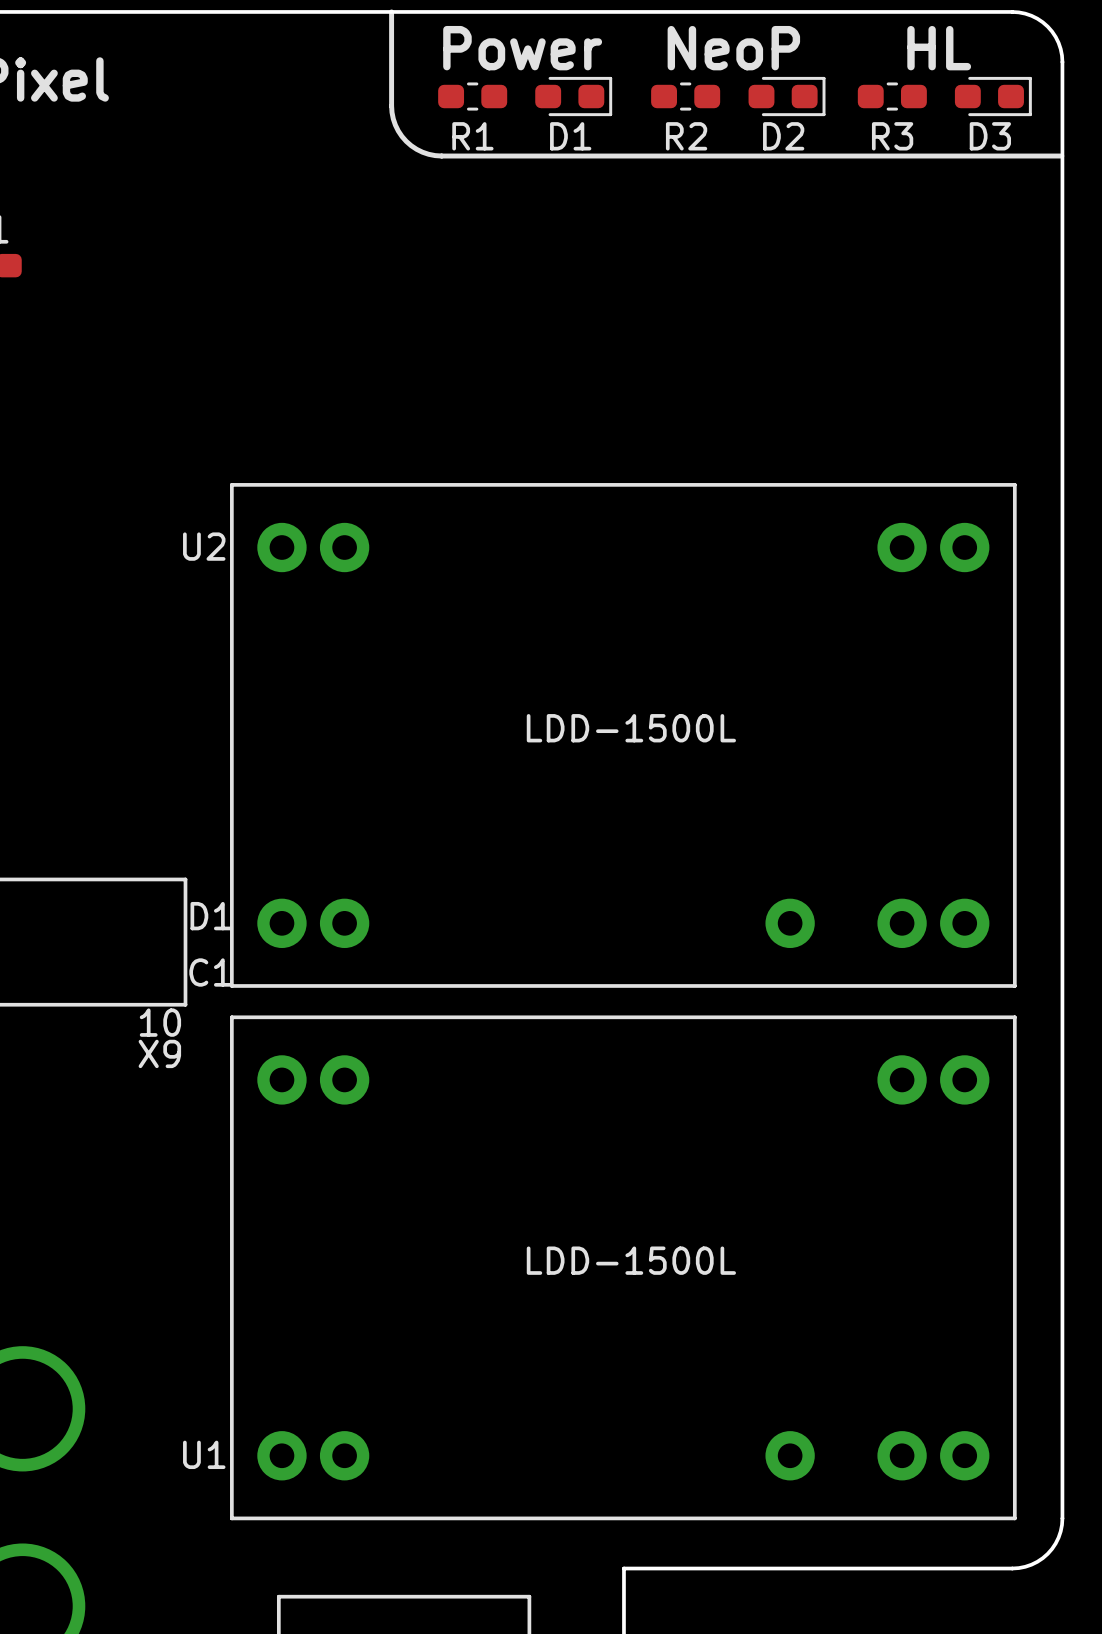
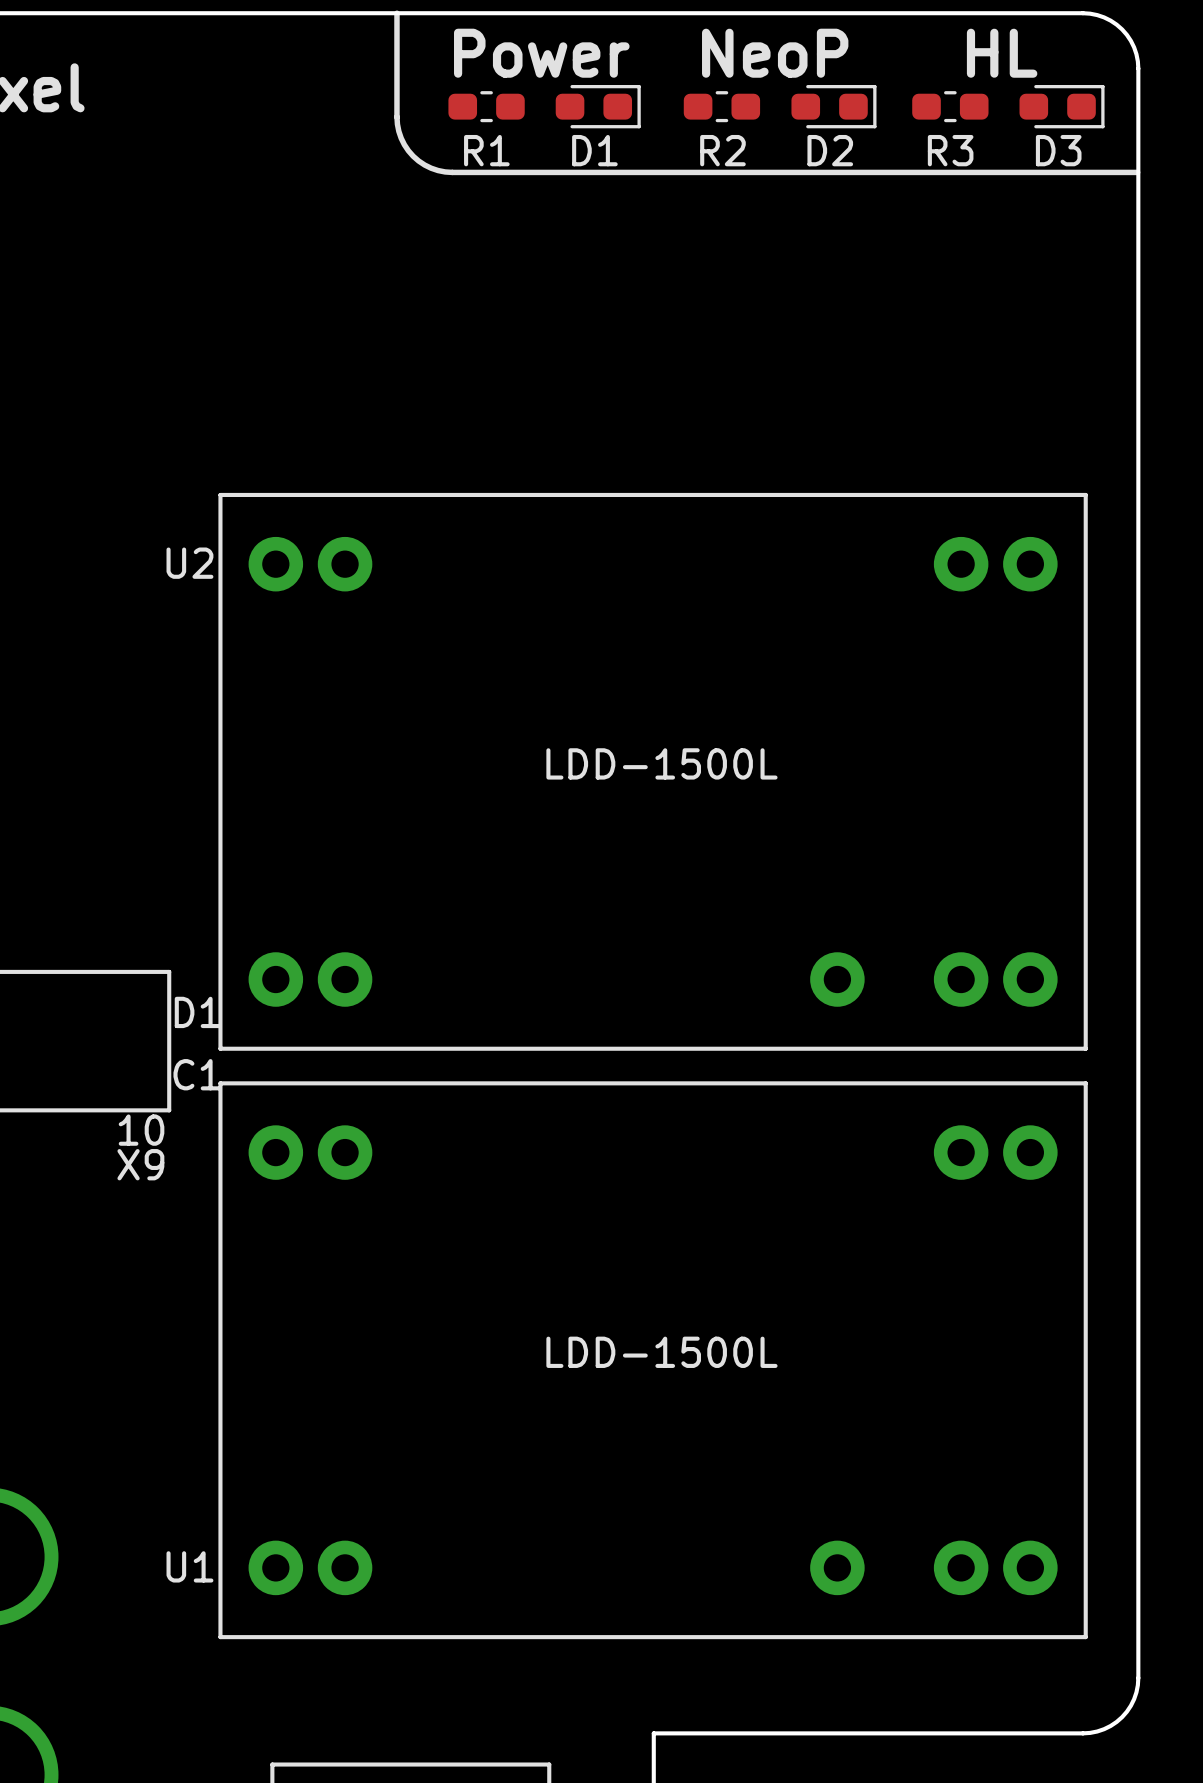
U2 position: (623, 735) -> (653, 771)
U1 position: (623, 1267) -> (653, 1360)

